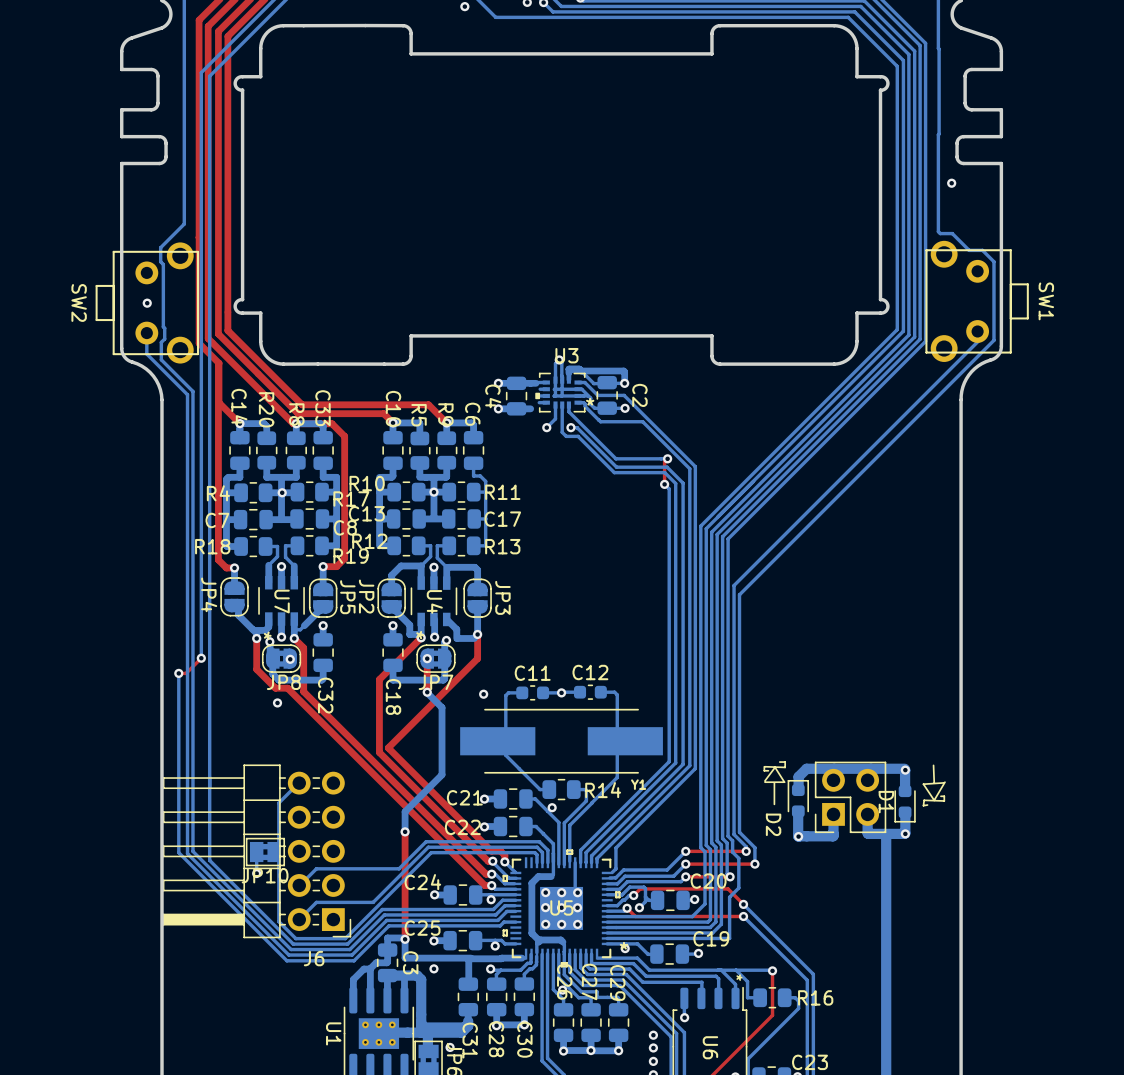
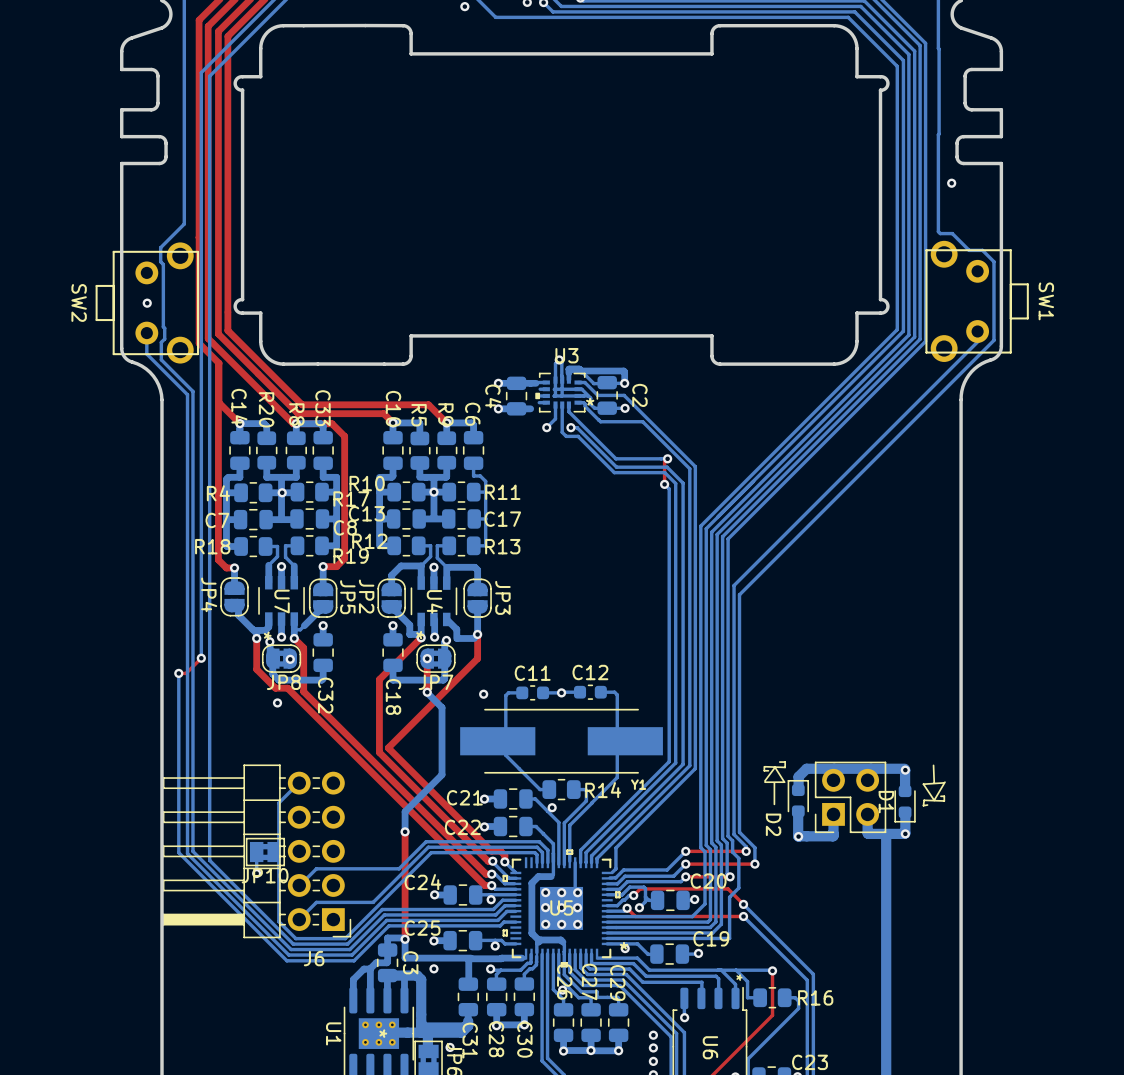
U1 text: none -> * (383, 1033)

